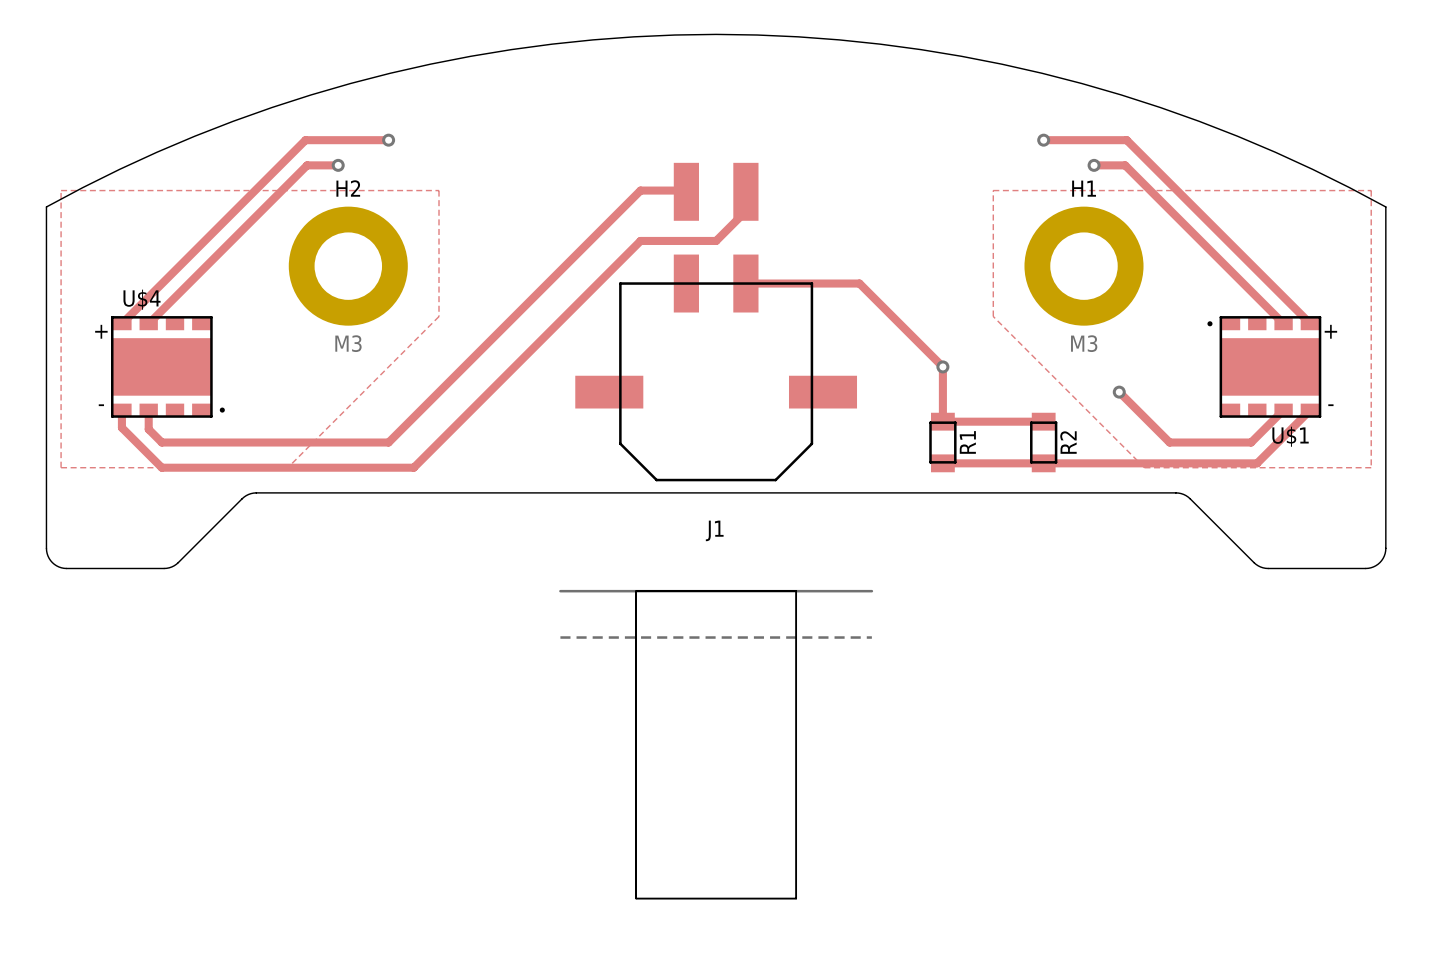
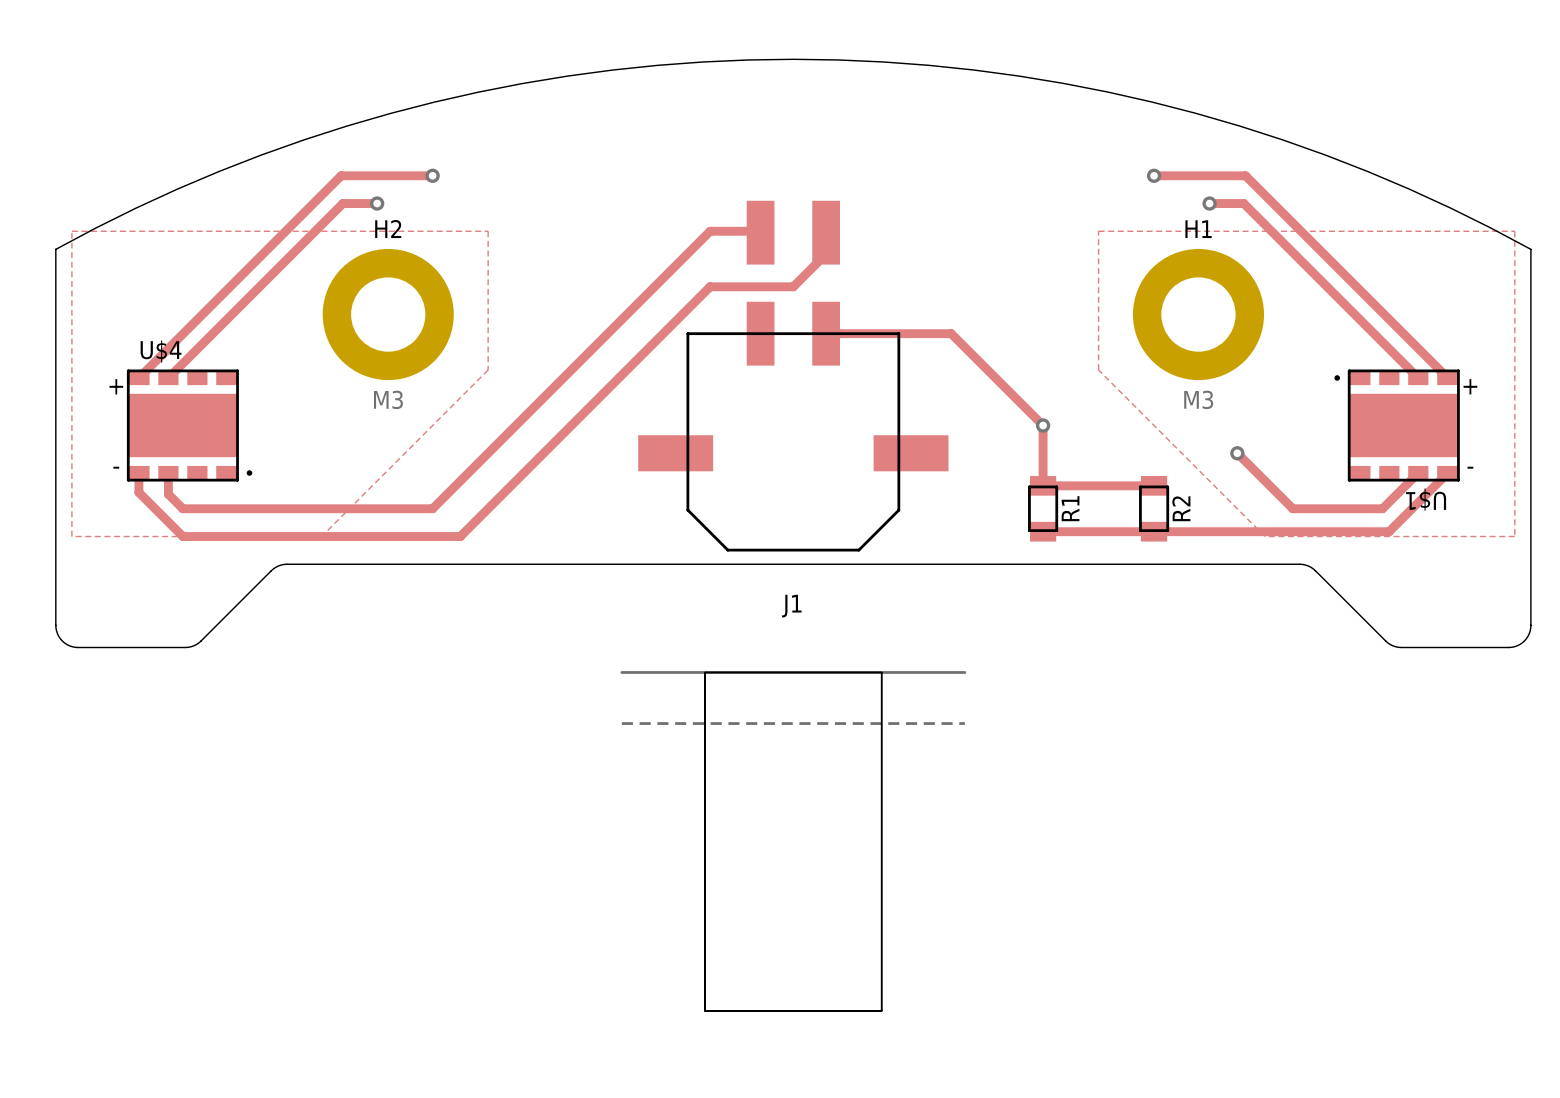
U$1 name rotation: 0° (1290, 436) -> 180° (1426, 499)

